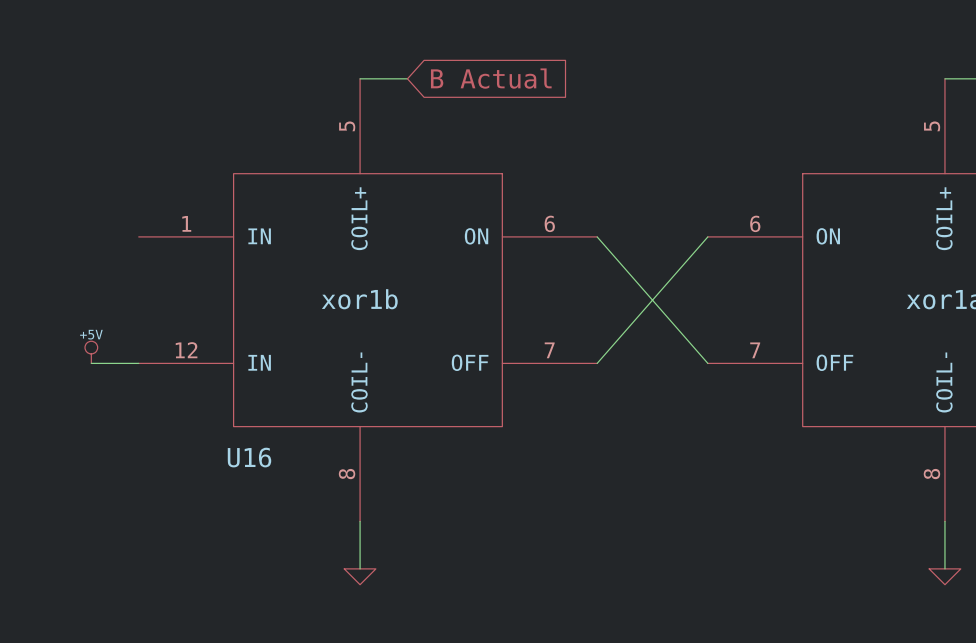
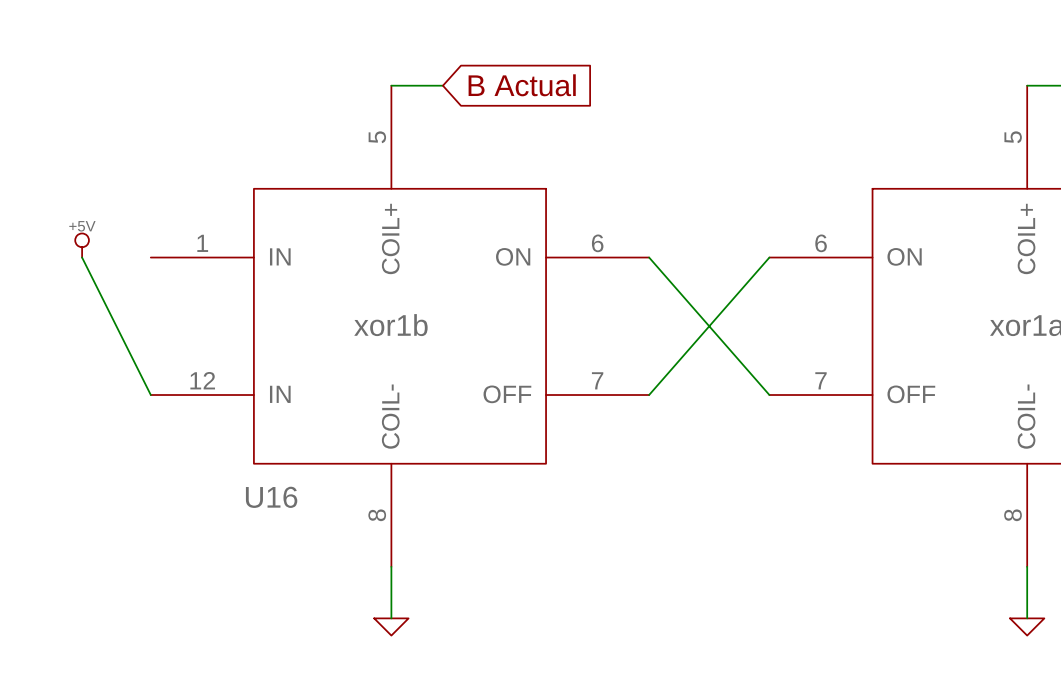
power symbol position: +5V (91, 352) -> +5V (82, 245)
wire: (91, 363) (138, 363) -> (82, 257) (150, 395)

